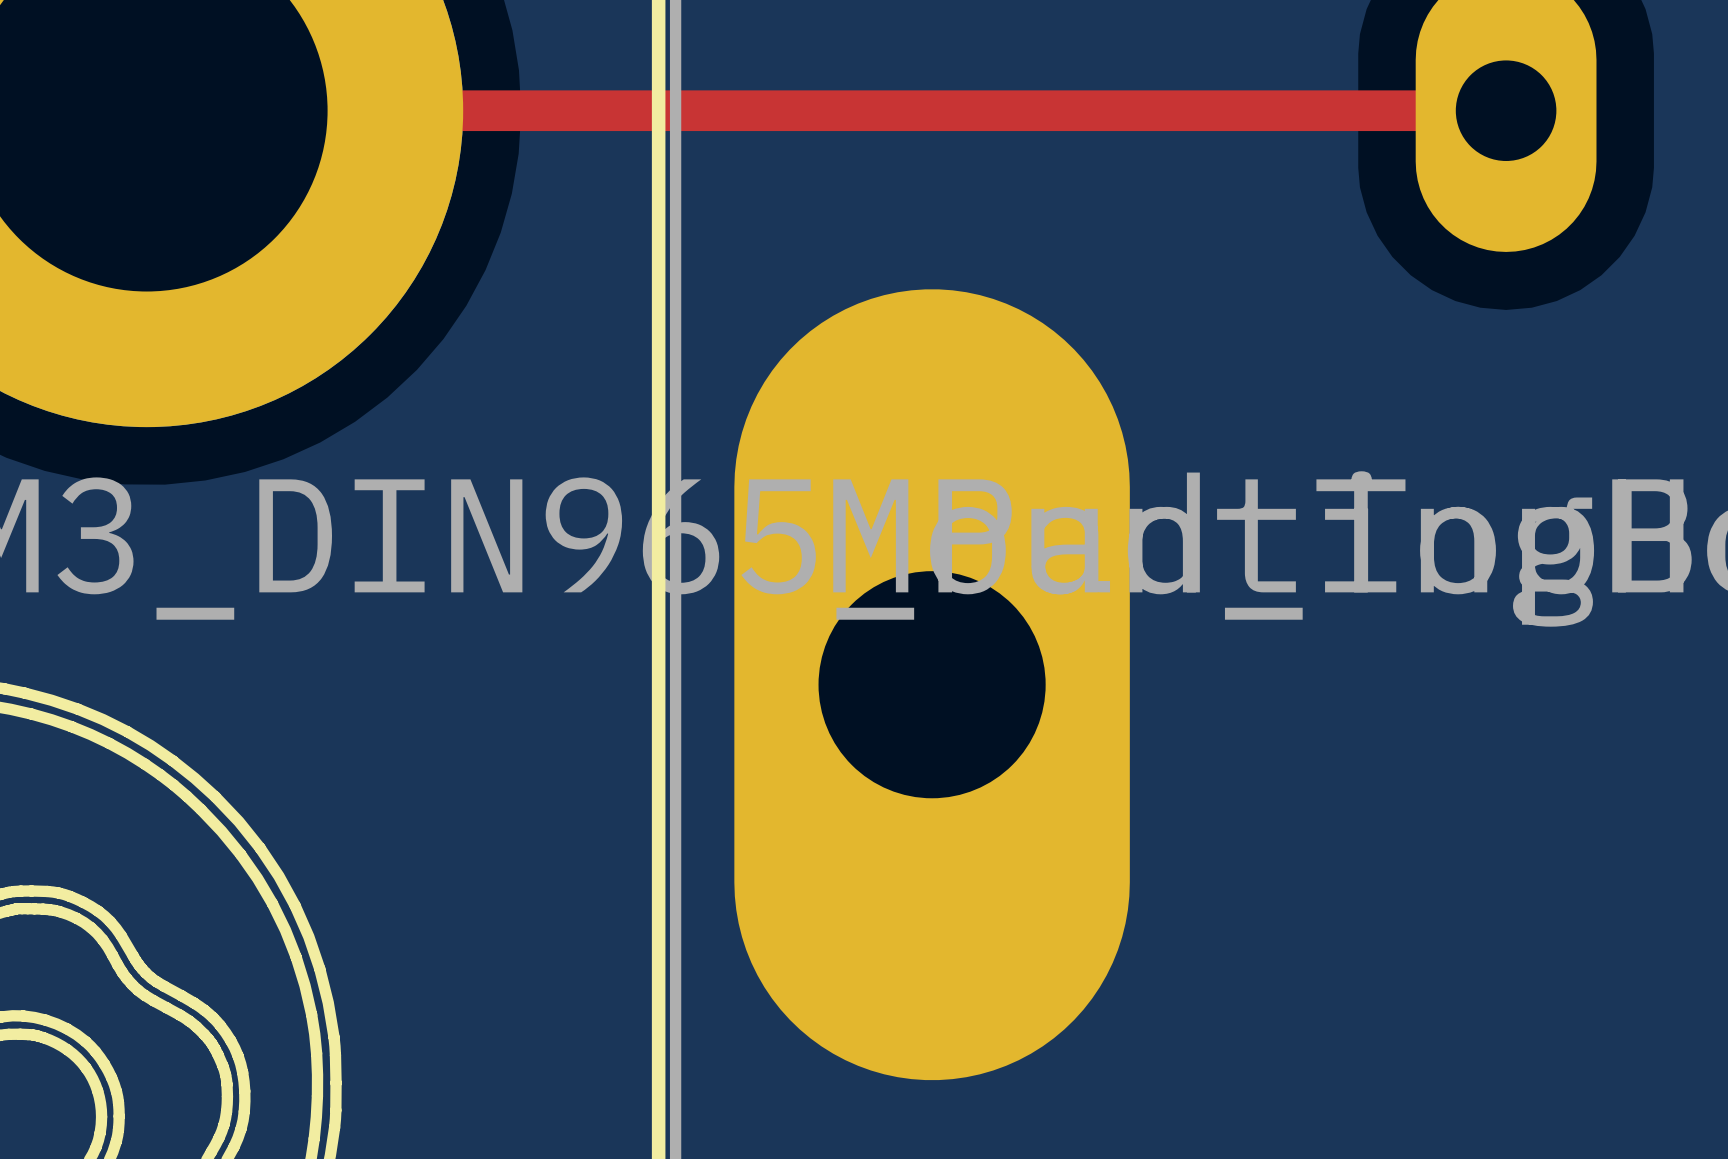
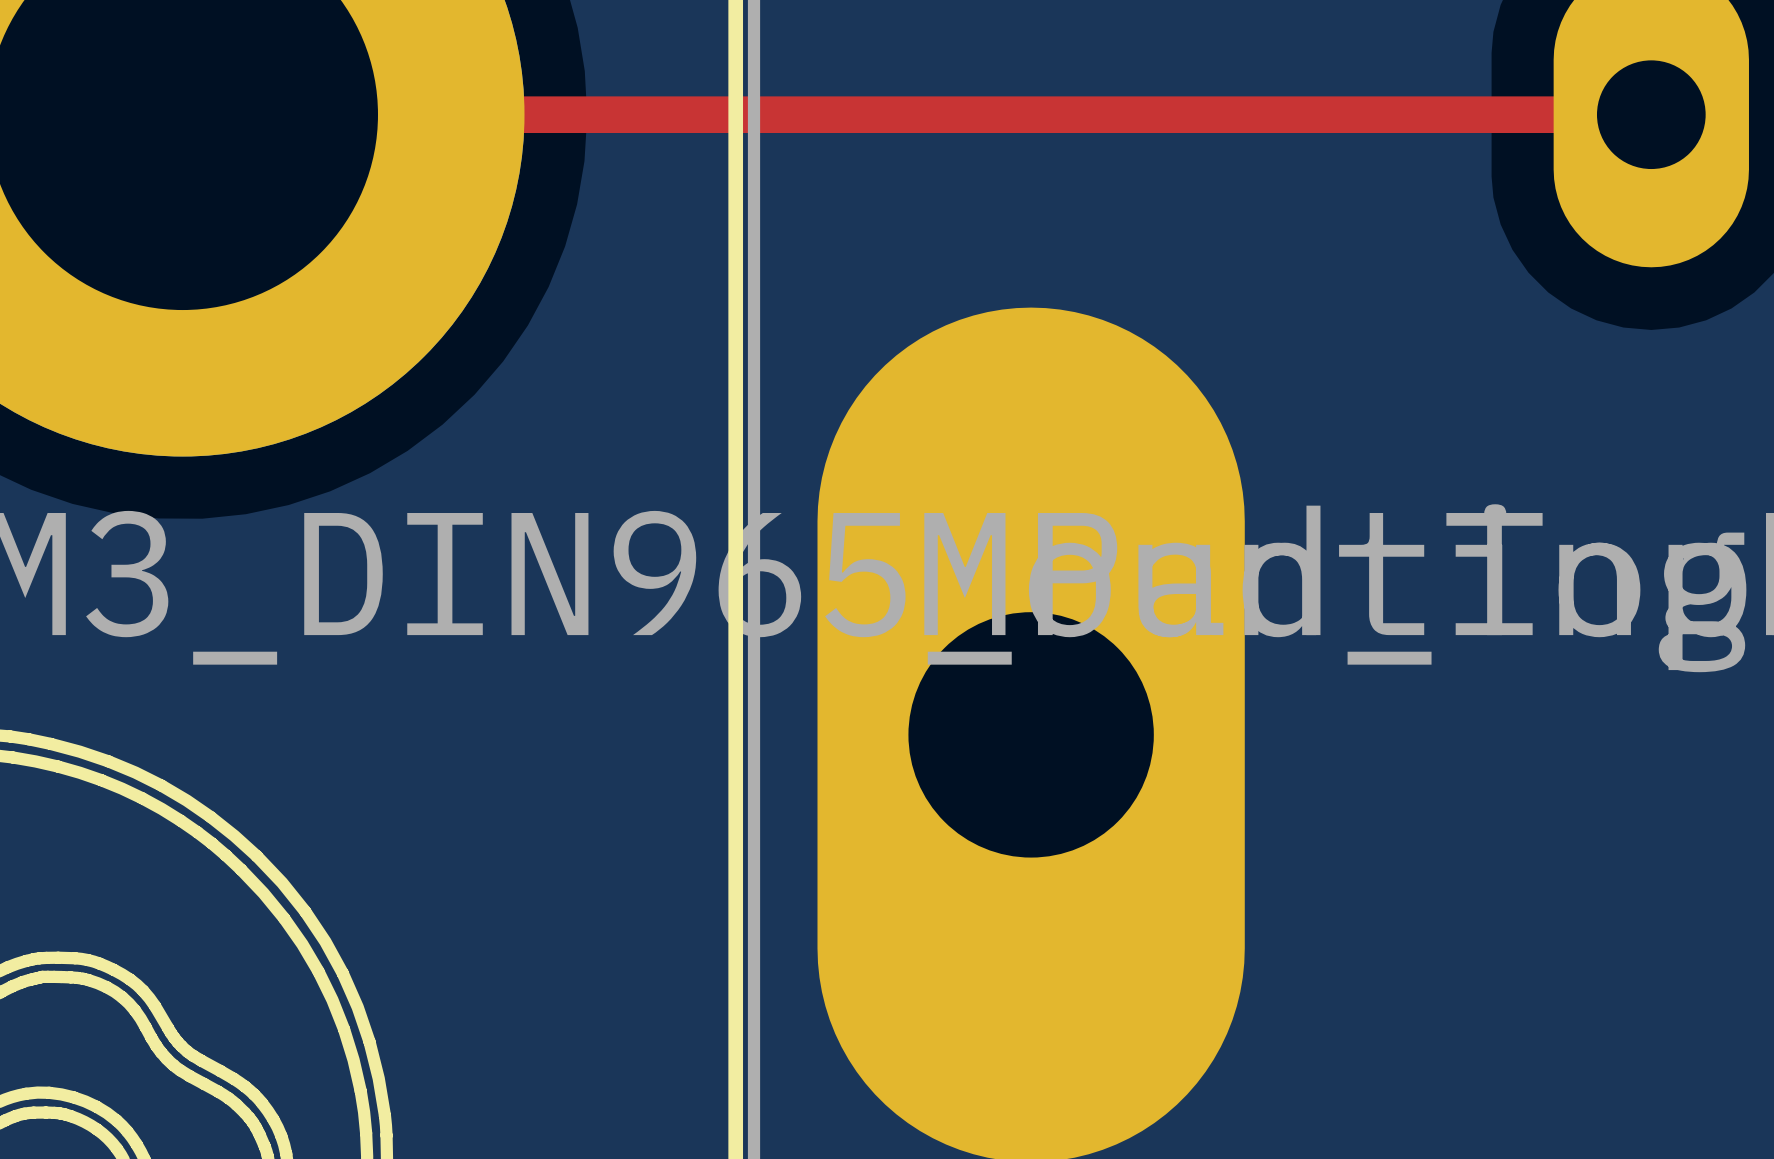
top track width: thick (146, 110) (1506, 110) -> thin (182, 114) (1651, 114)

